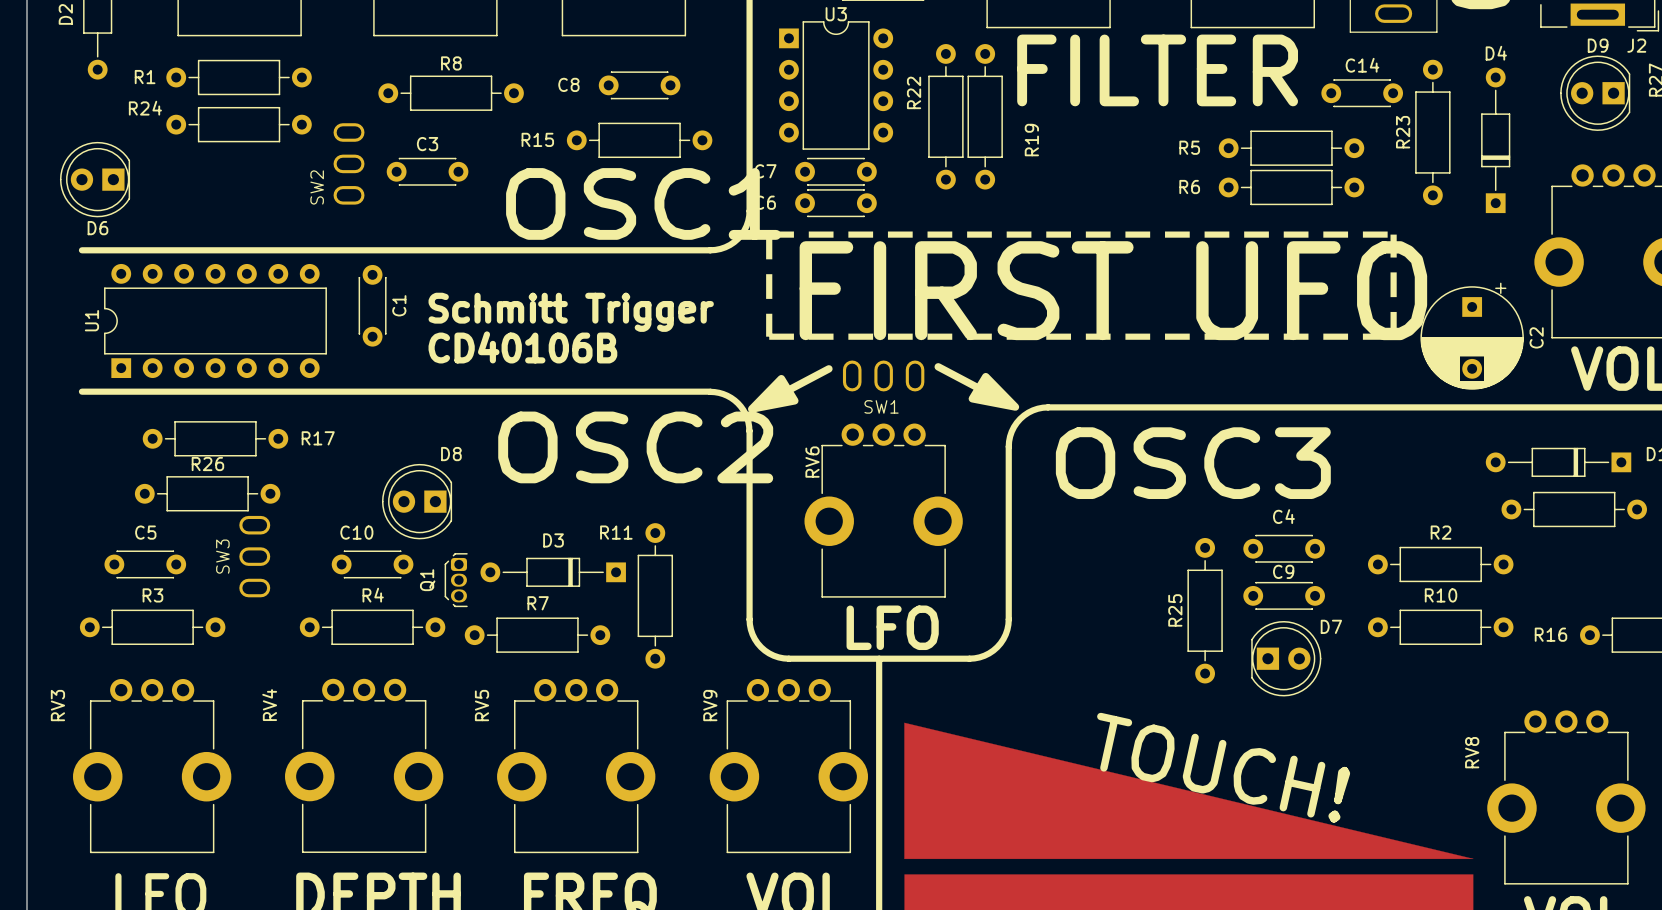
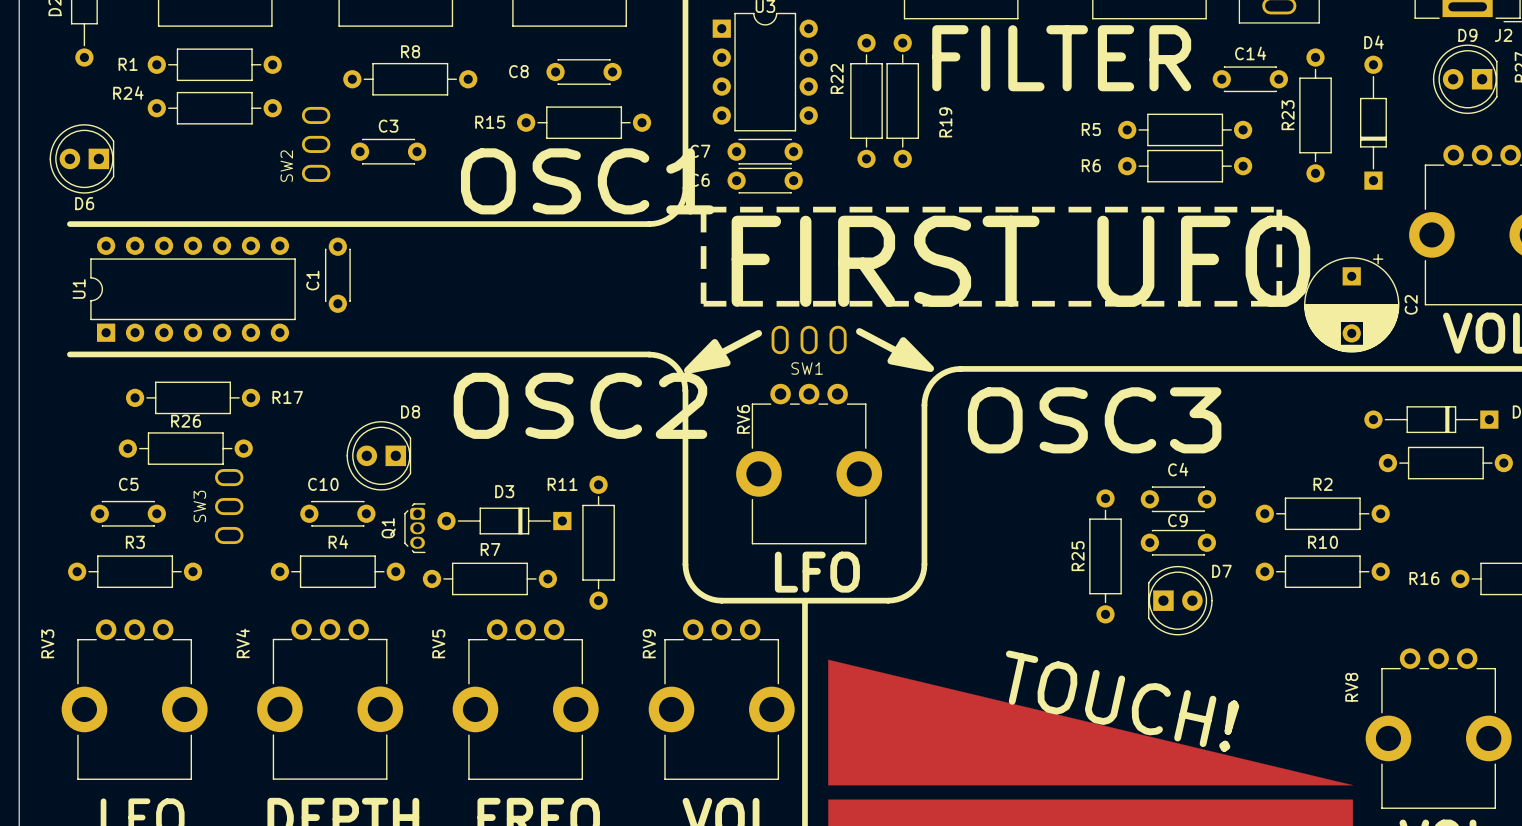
C1 name position: C1 (399, 305) -> C1 (312, 280)
text: Schmitt Trigger (571, 312) -> none
text: CD40106B (522, 347) -> none

